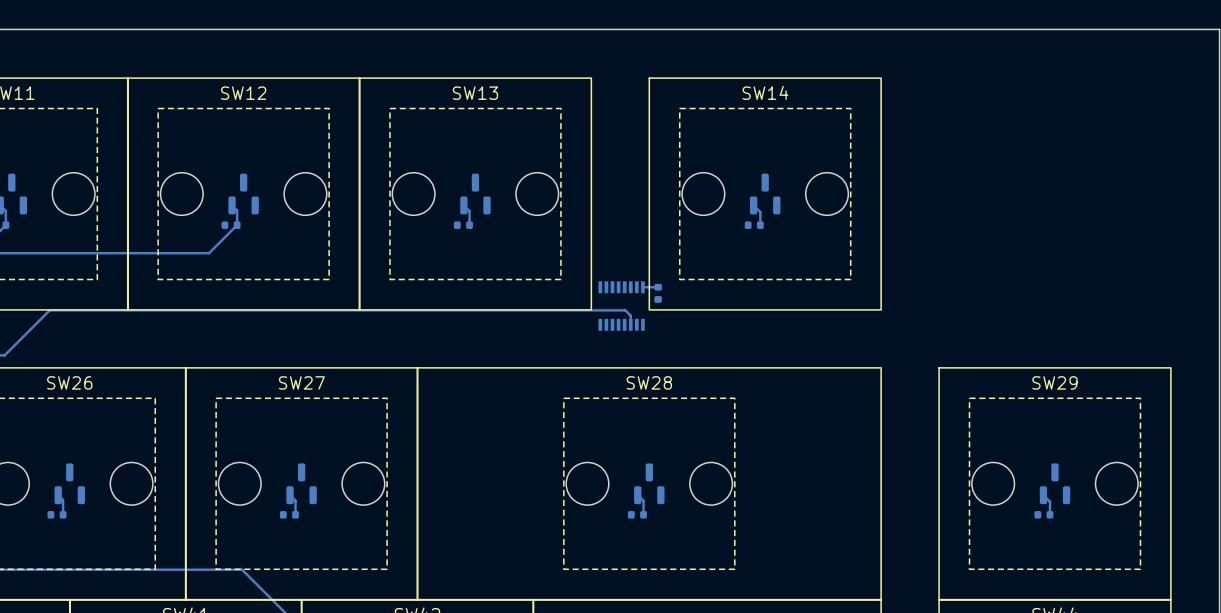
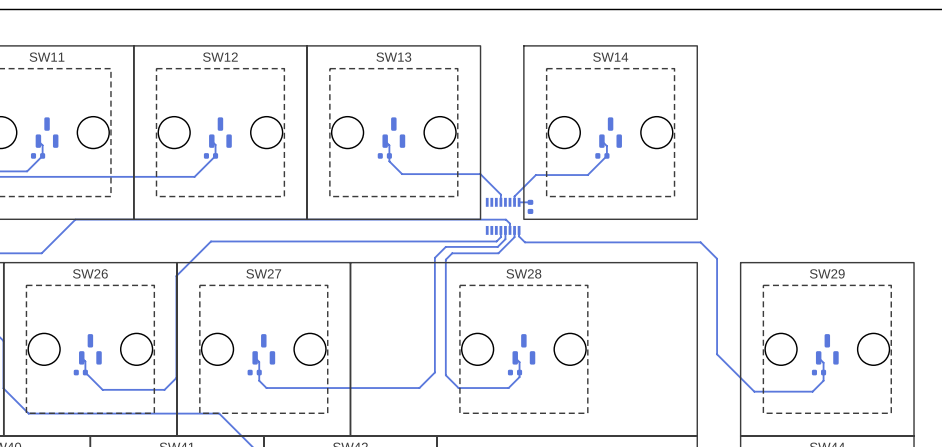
bottom track: none -> (389, 155) (389, 161) (402, 174) (480, 174) (500, 194) (500, 202)
bottom track: none -> (606, 155) (587, 175) (535, 175) (514, 196) (514, 202)
bottom track: none -> (500, 230) (500, 237) (496, 241) (210, 241) (176, 276) (176, 378) (164, 389) (102, 389) (85, 372)
bottom track: none -> (505, 230) (505, 239) (497, 246) (445, 246) (434, 257) (434, 372) (419, 388) (266, 388) (259, 380) (259, 372)
bottom track: none -> (514, 230) (514, 237) (498, 253) (452, 253) (445, 259) (445, 375) (458, 388) (508, 388) (519, 377) (519, 372)
bottom track: none -> (519, 230) (519, 236) (525, 242) (700, 242) (717, 258) (717, 354) (754, 391) (812, 391) (823, 380) (823, 372)

